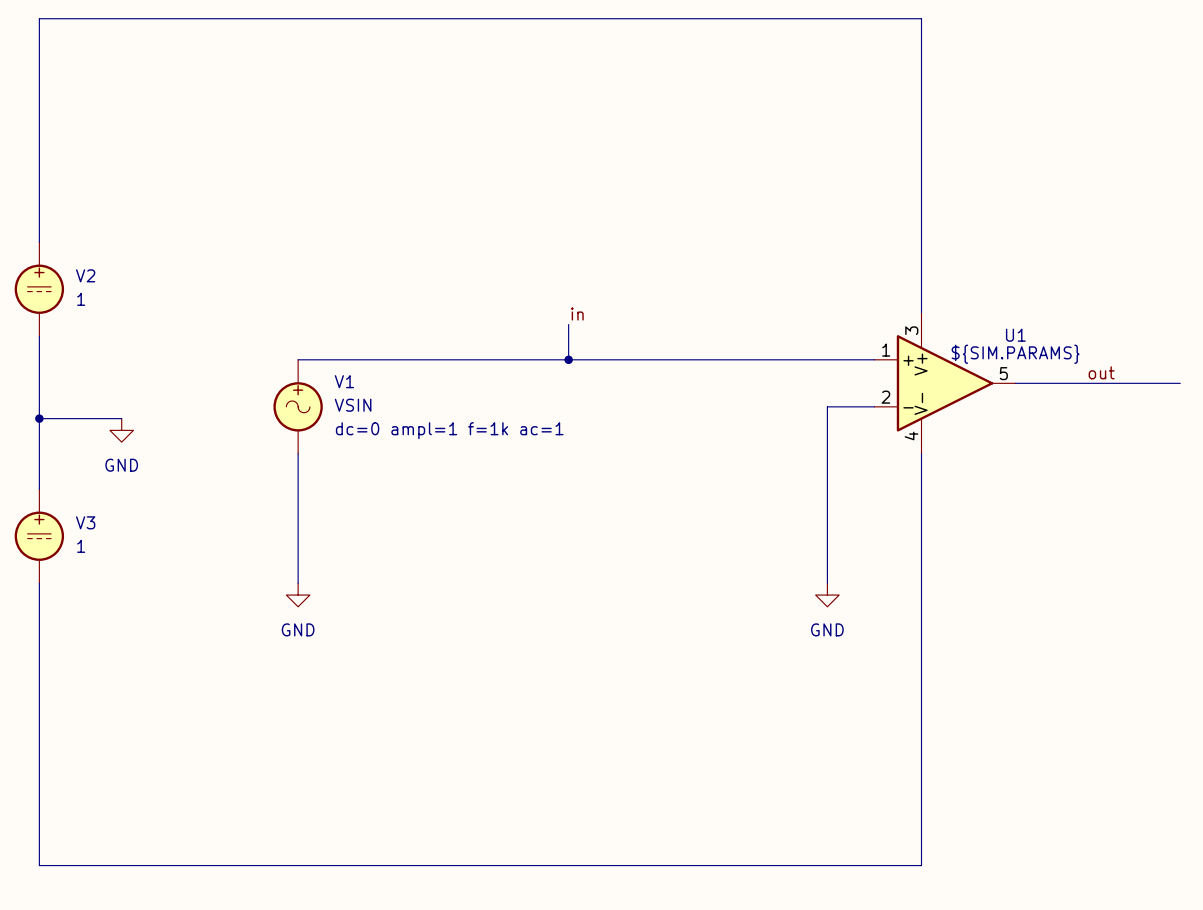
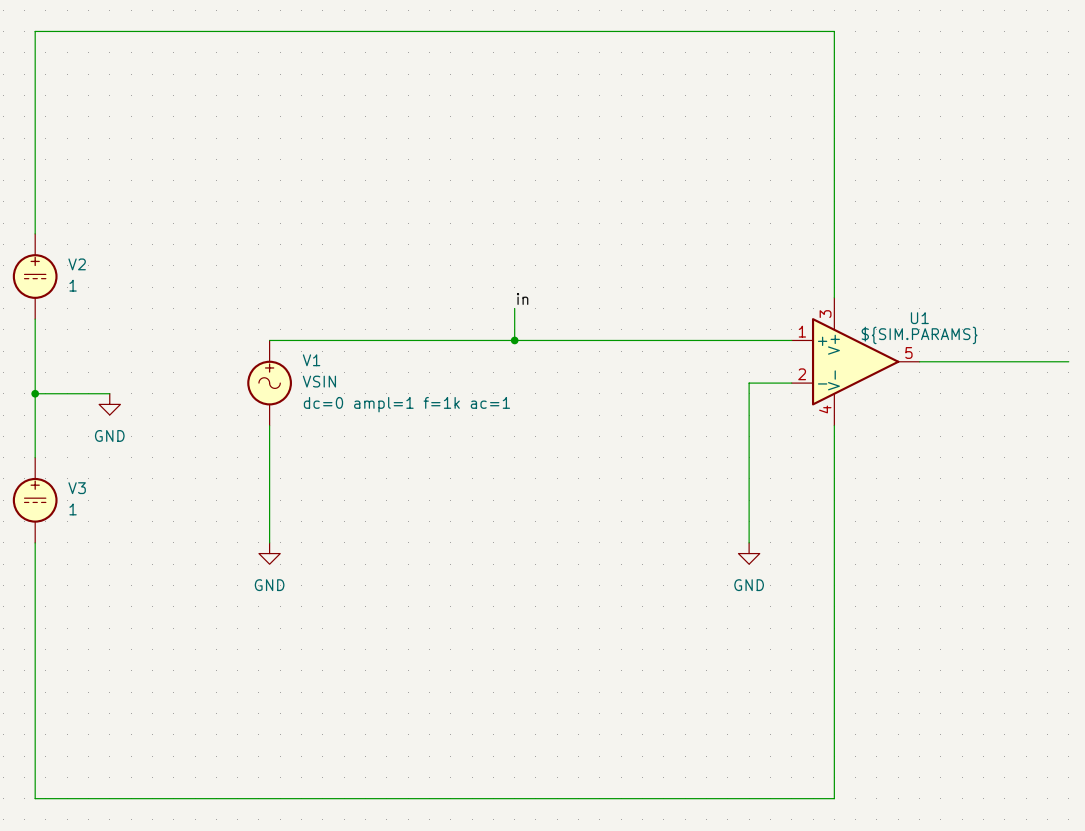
label: out (1101, 372) -> none

